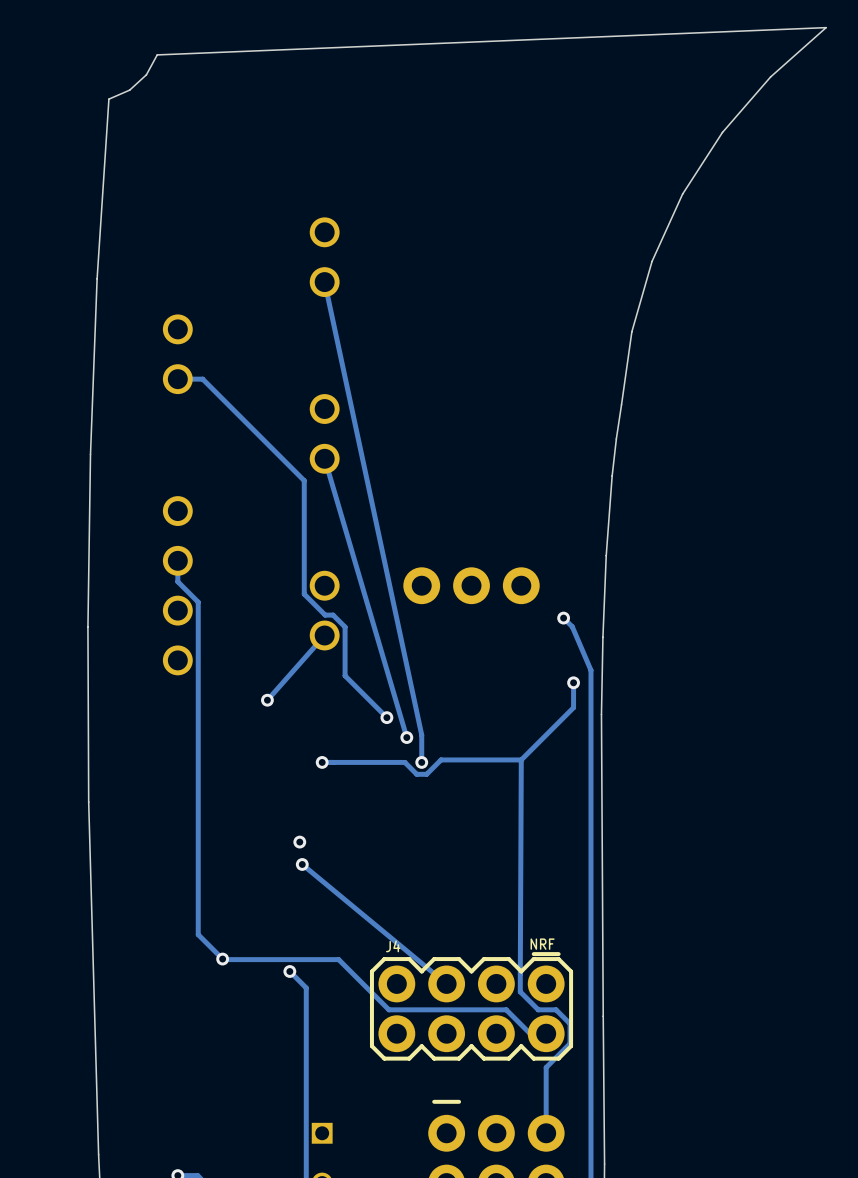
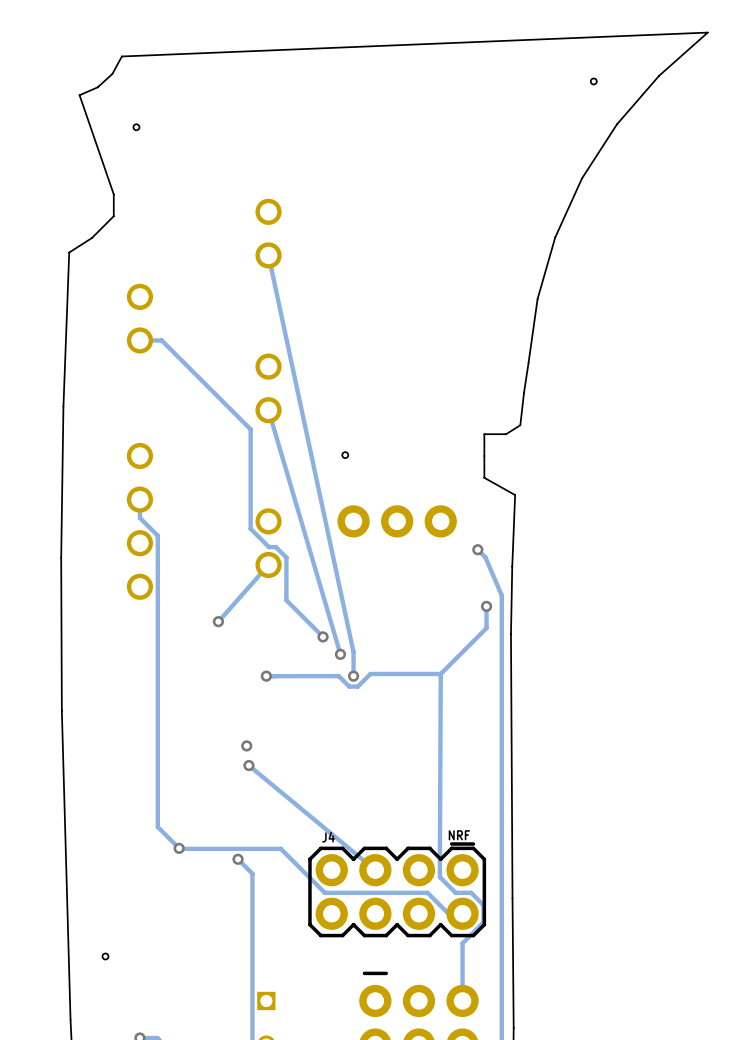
hole: none -> (593, 81)
board edge: (108, 99) (97, 278) -> (79, 95) (113, 194) (113, 216) (91, 238) (69, 252)
hole: none -> (136, 127)
board edge: (612, 475) (606, 555) -> (520, 425) (506, 434) (484, 434) (484, 477) (515, 495)
hole: none -> (345, 455)
hole: none -> (105, 956)

